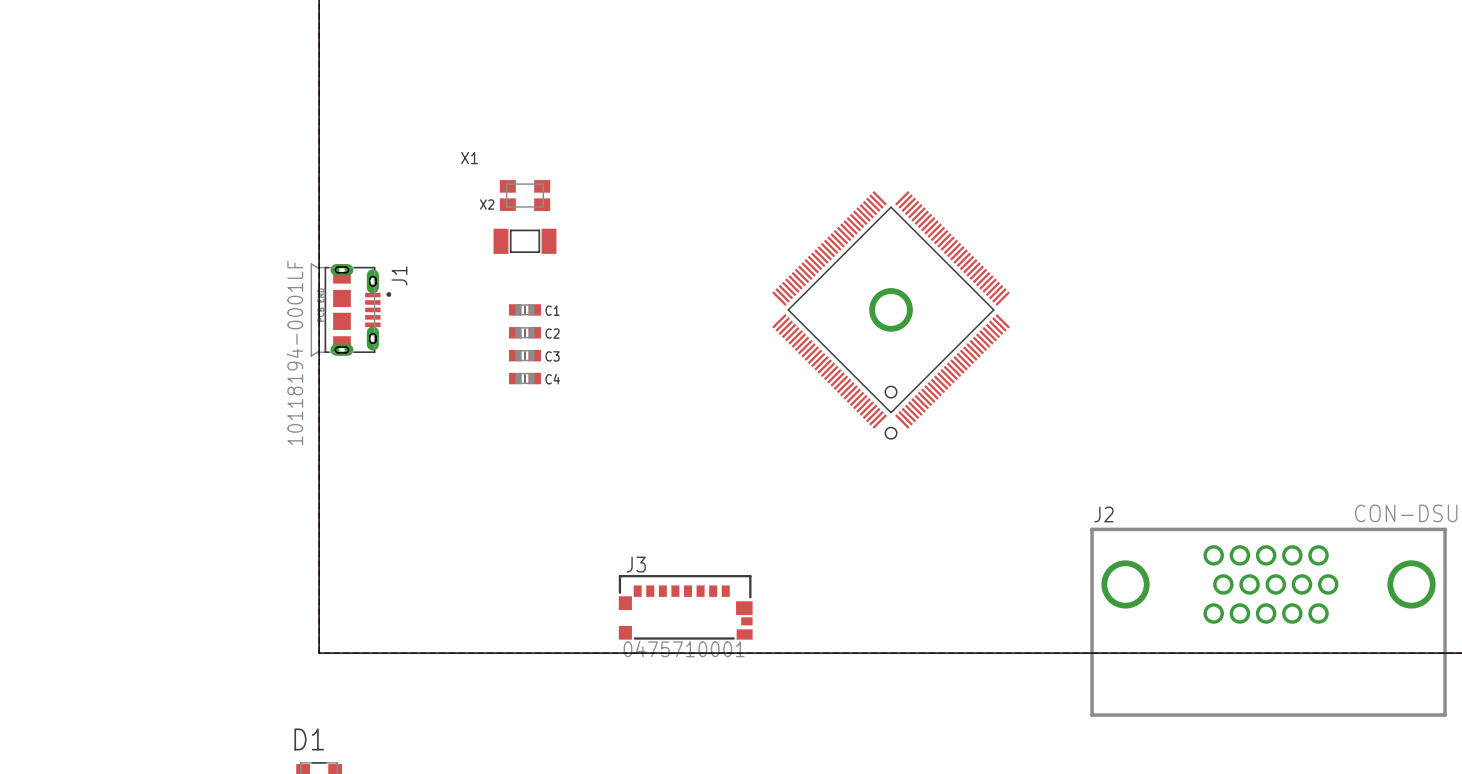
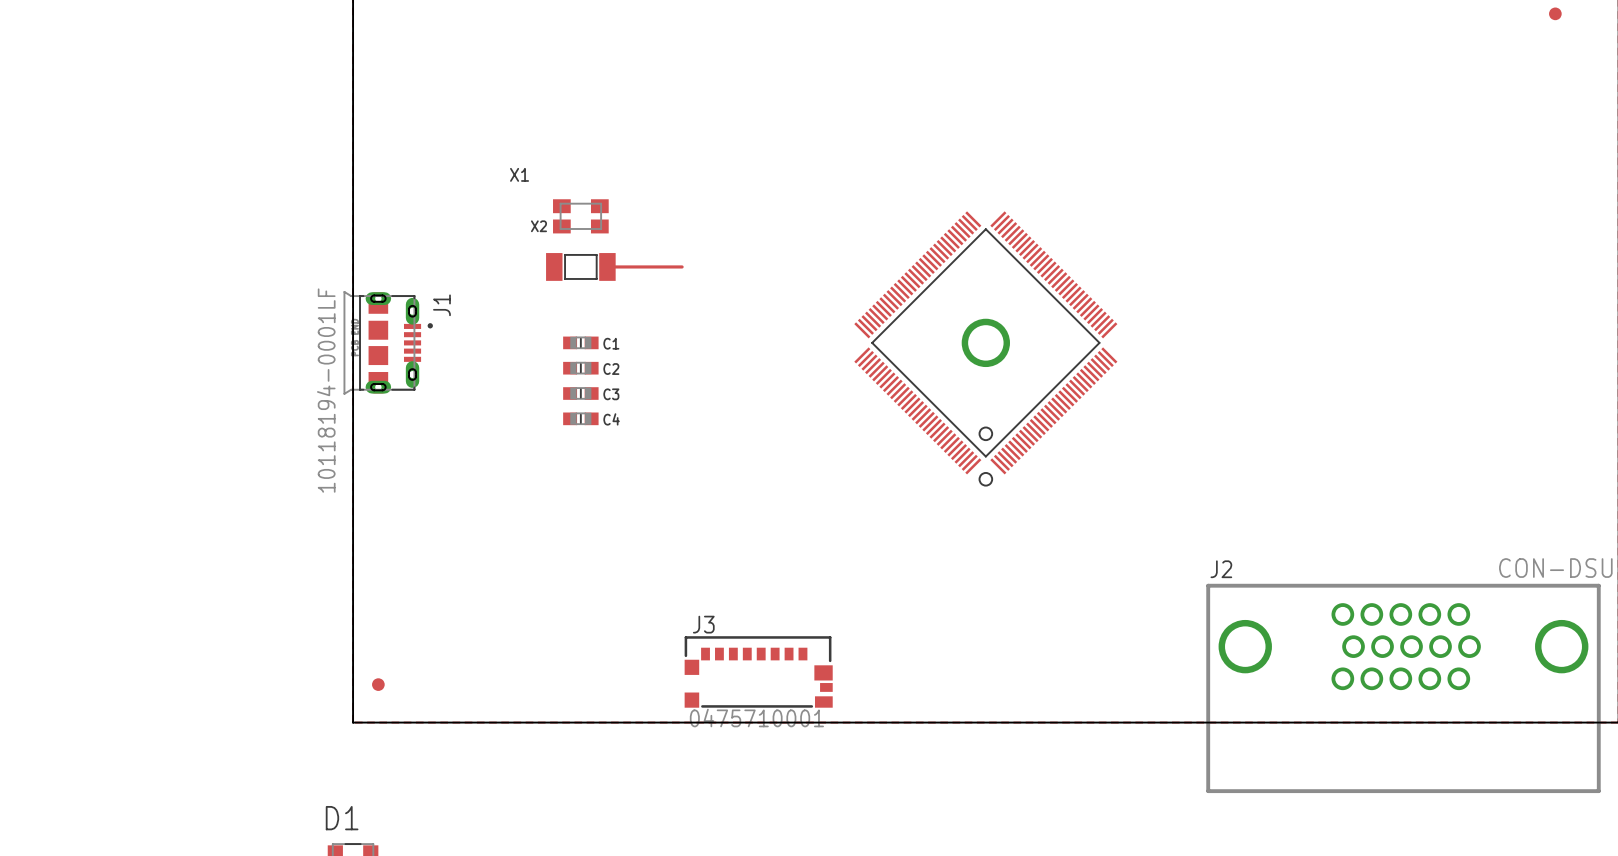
part: none -> (1555, 13)
top track: none -> (607, 266) (682, 266)
part: none -> (378, 684)

